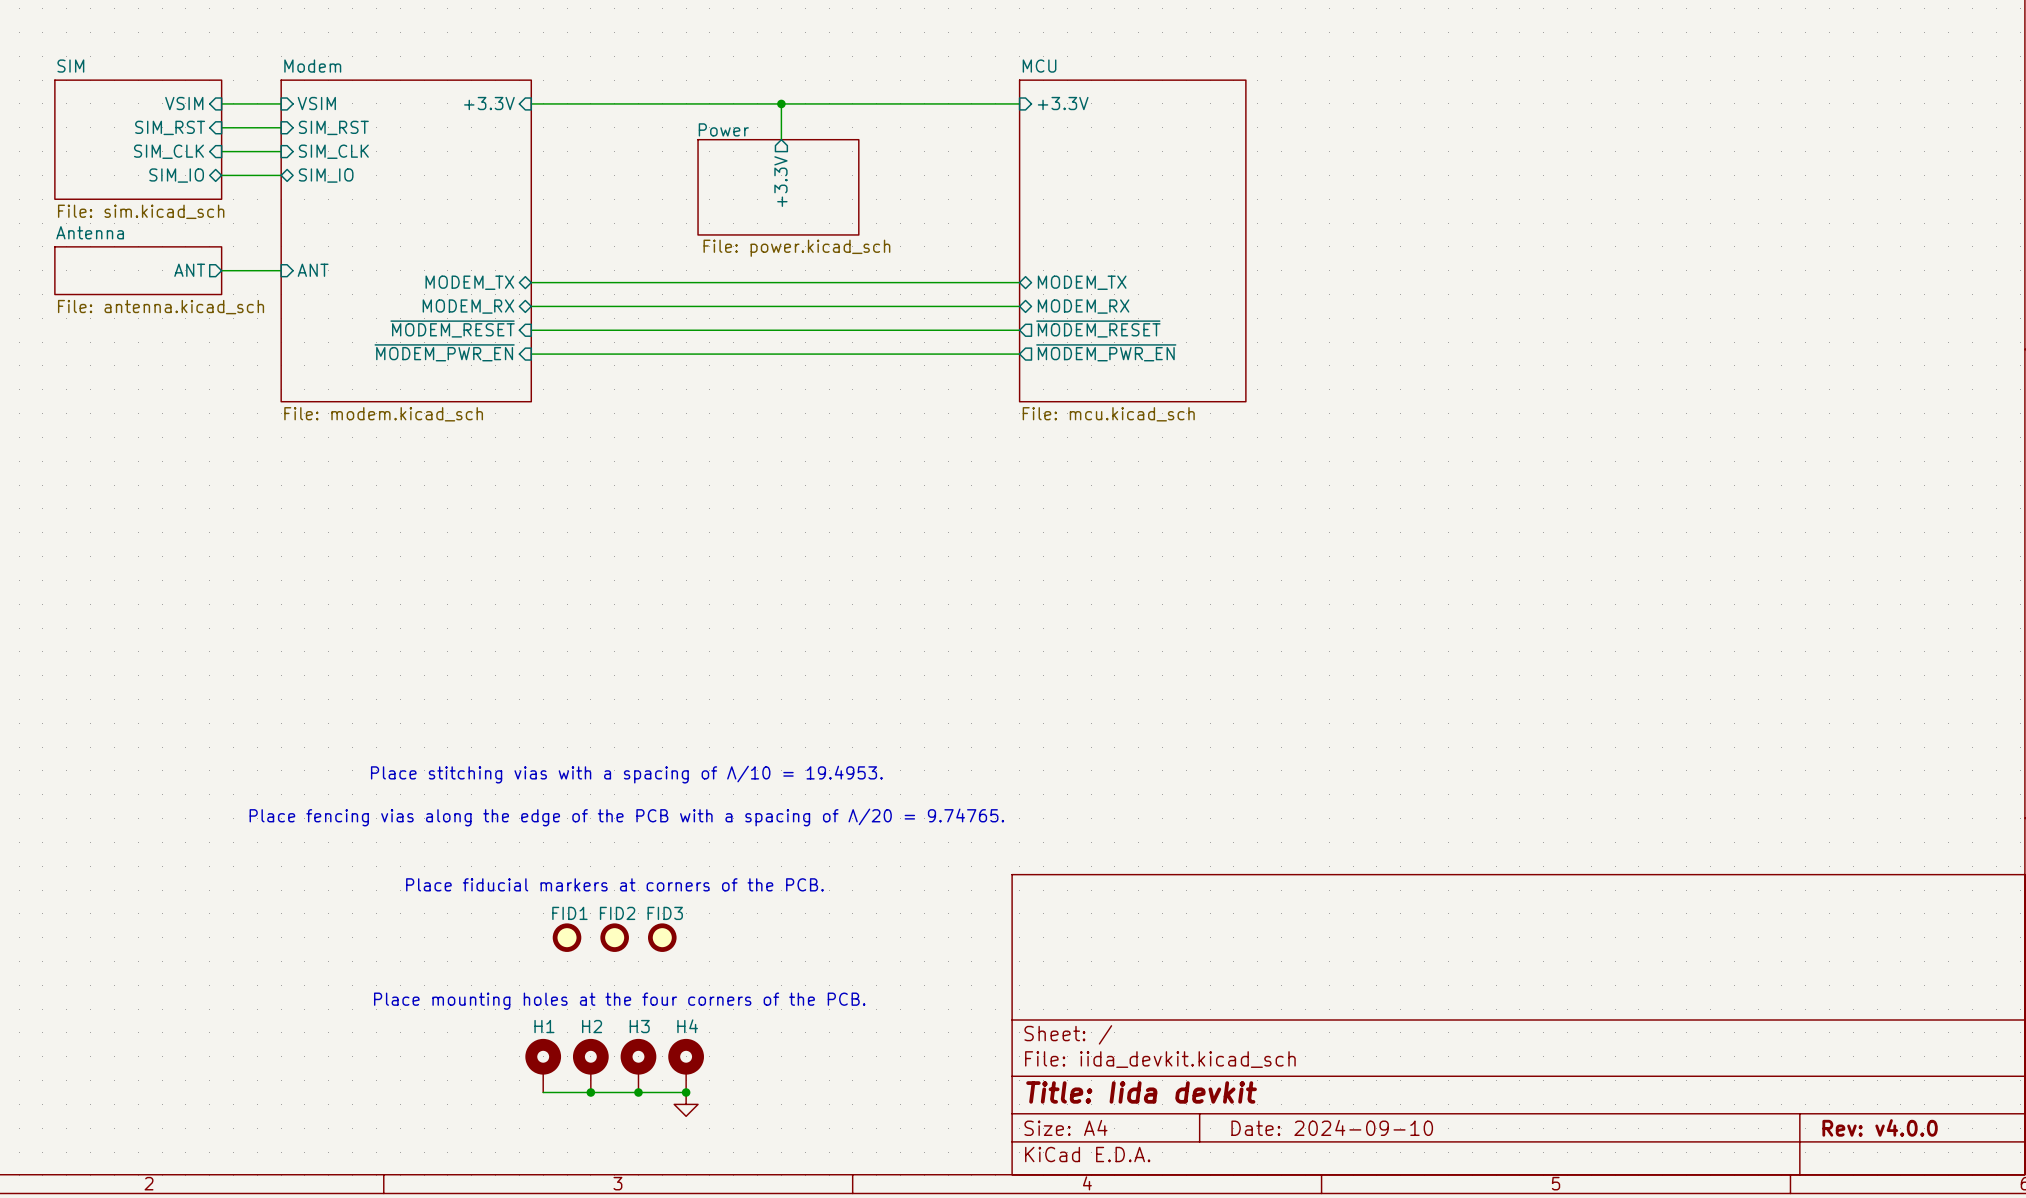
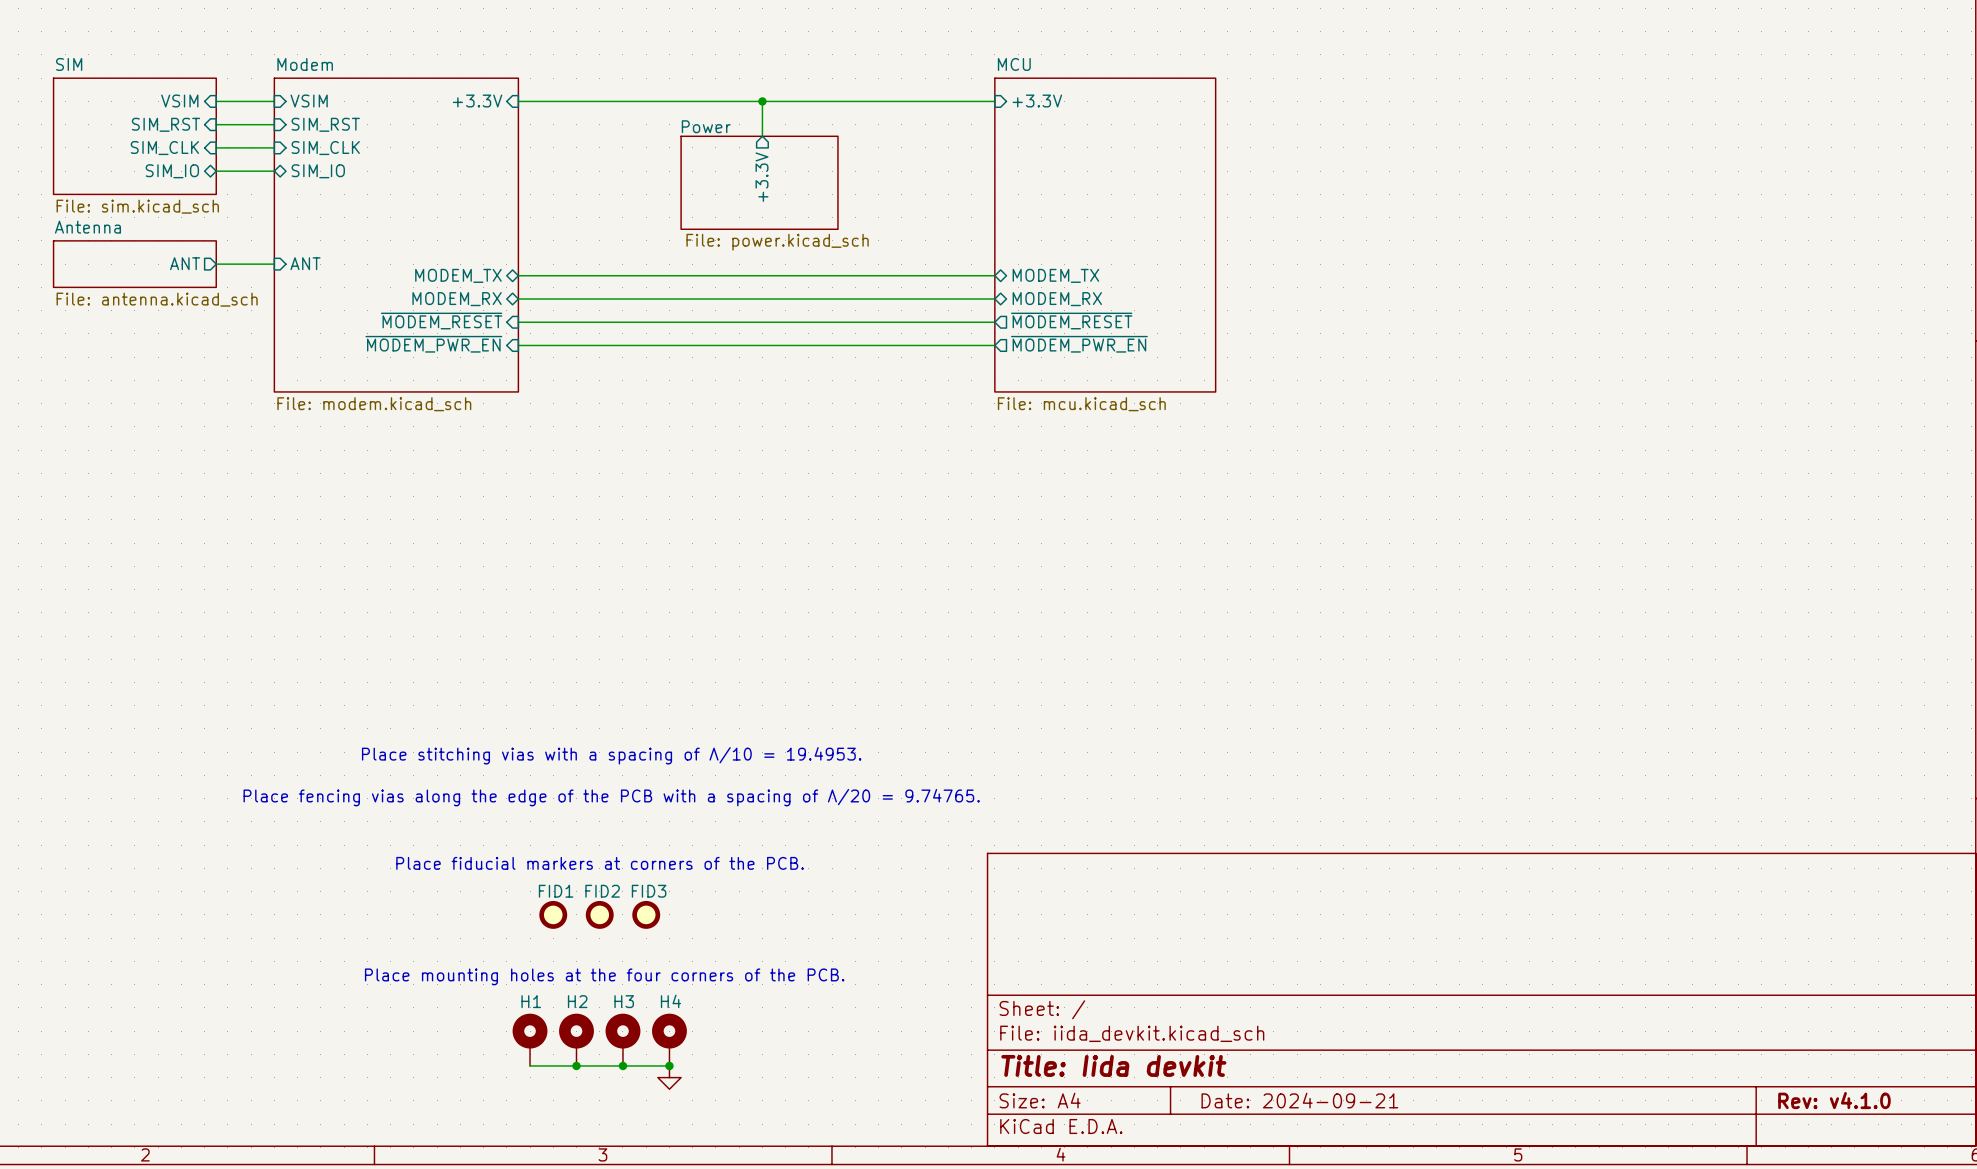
title block: Date: 2024-09-10 (1332, 1127) -> Date: 2024-09-21 (1299, 1100)
title block: Rev: v4.0.0 (1880, 1127) -> Rev: v4.1.0 (1834, 1100)

